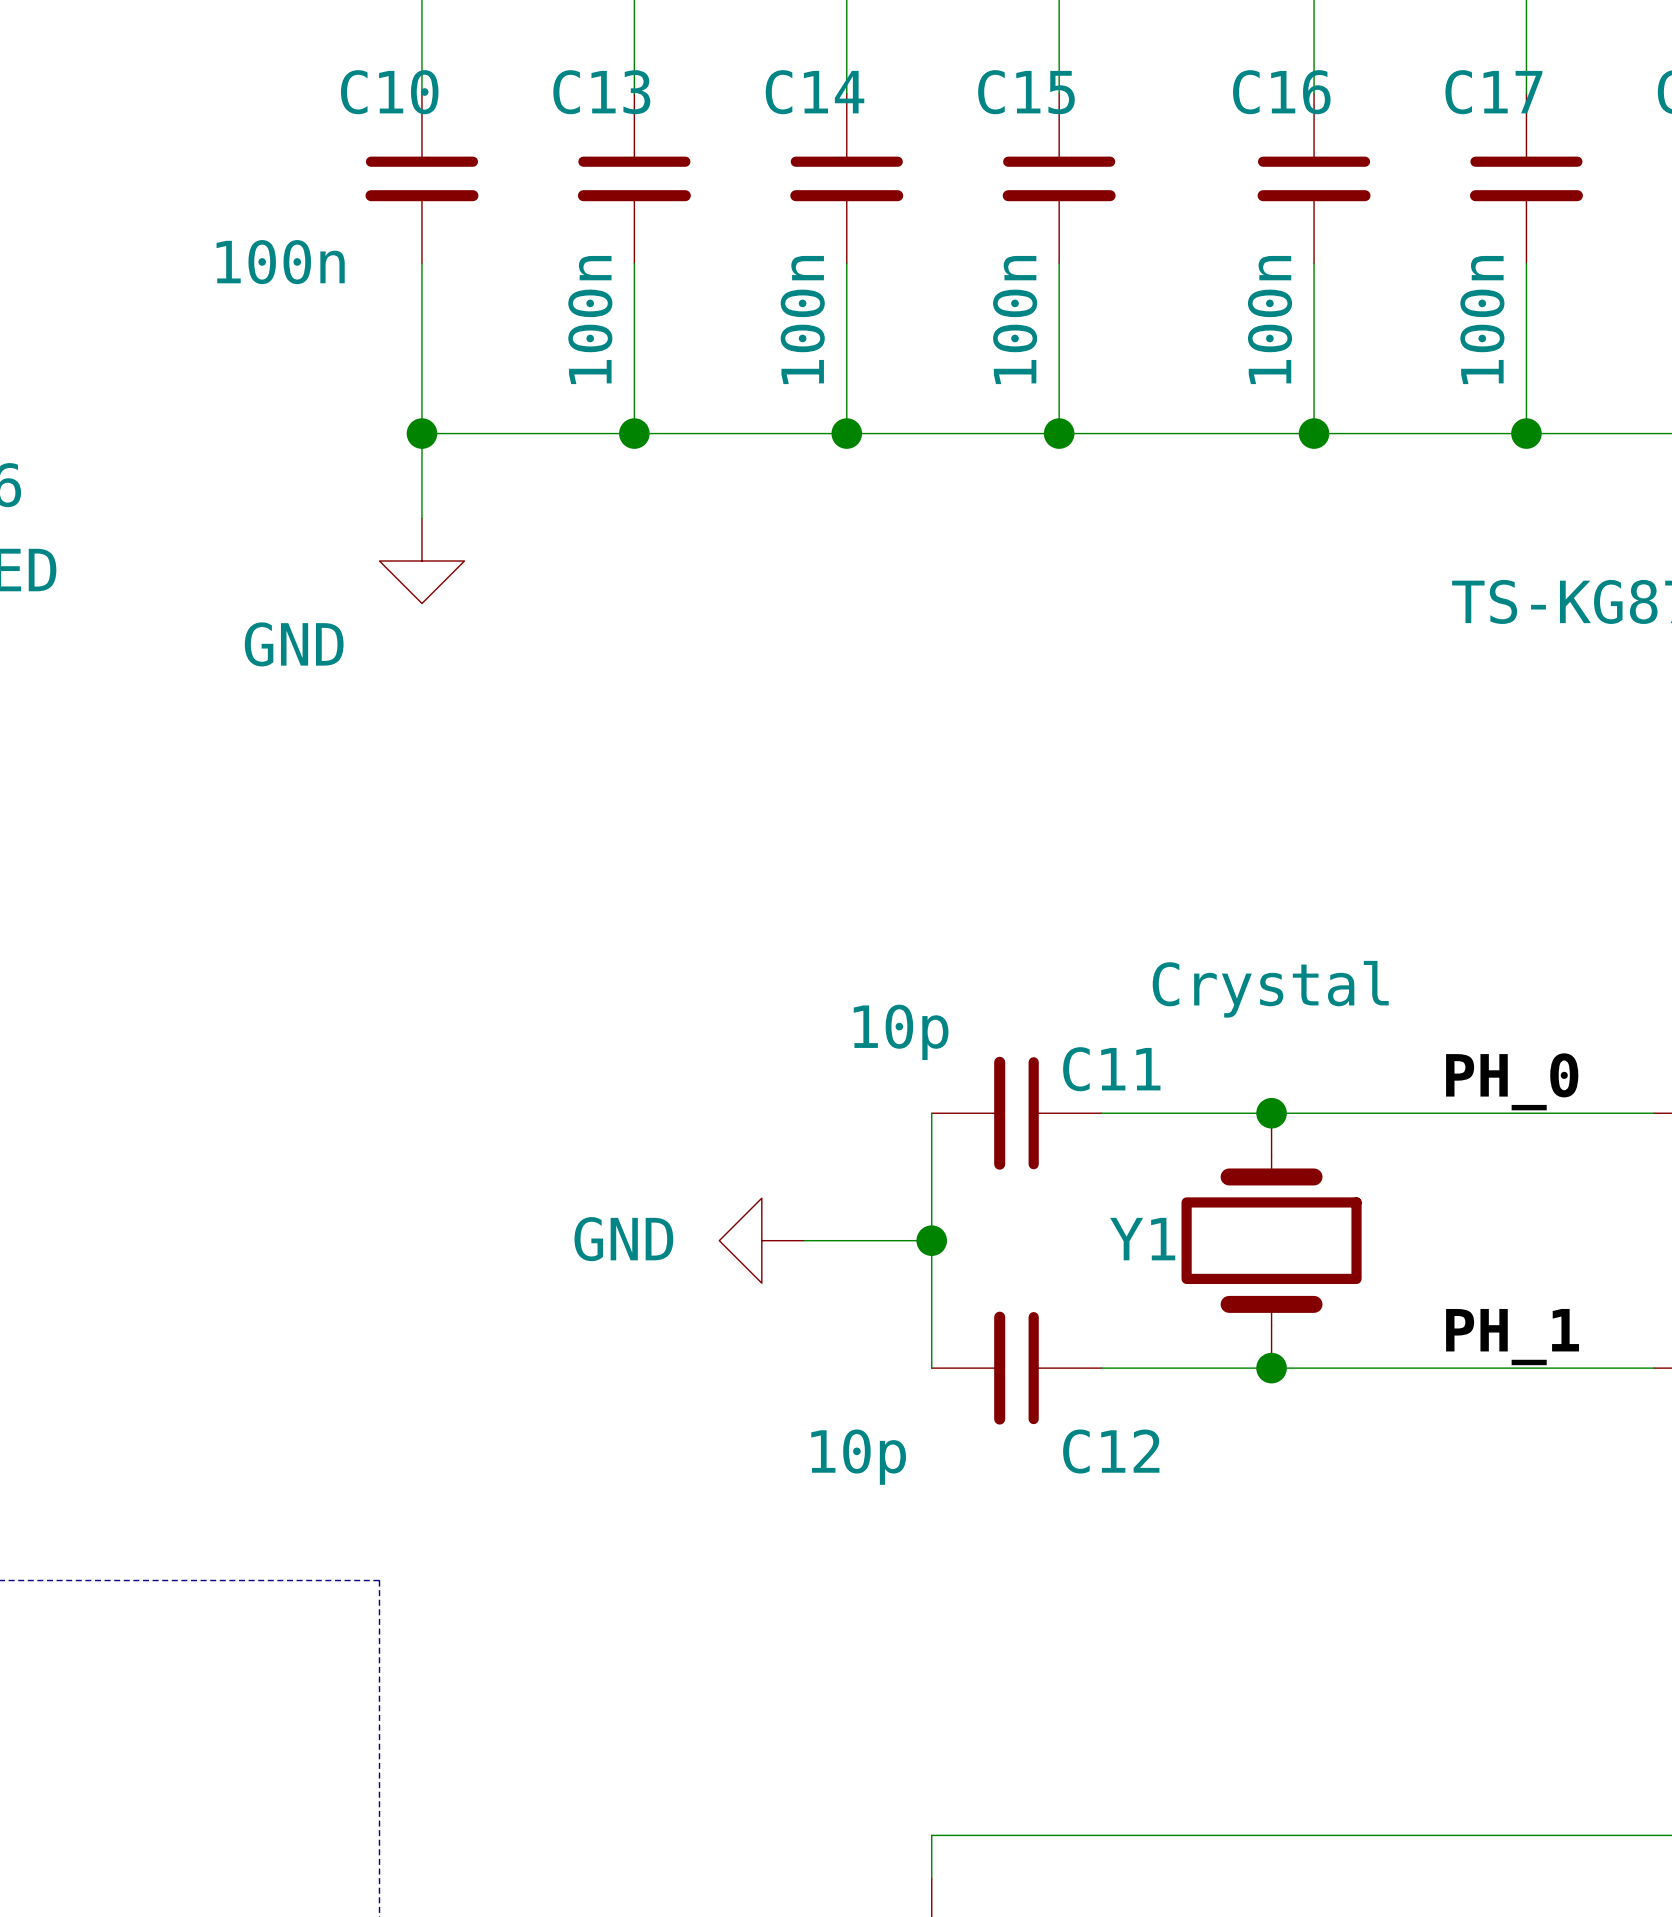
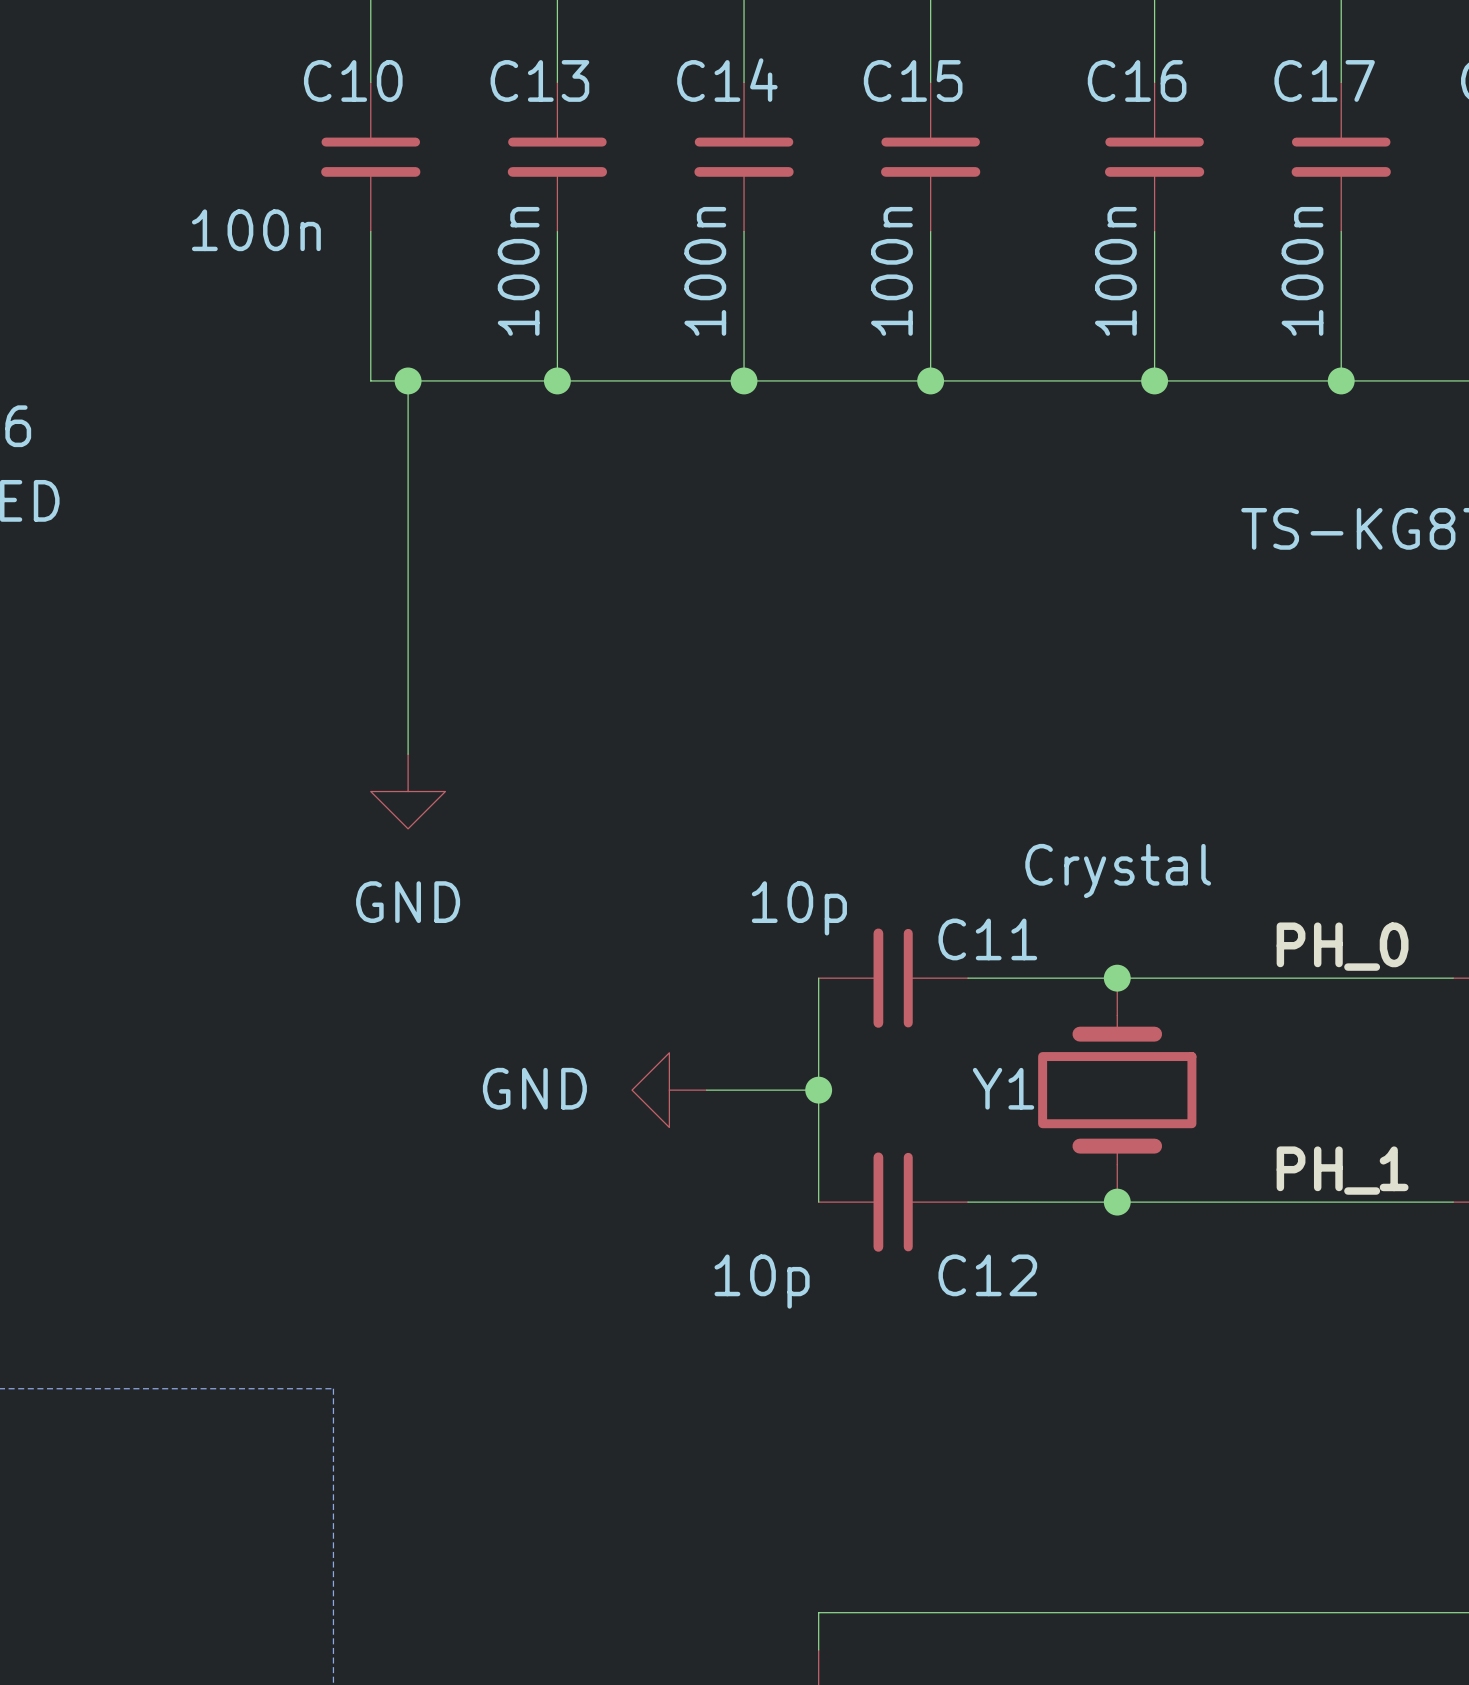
wire: (421, 433) (421, 518) -> none
junction position: (421, 433) -> (408, 380)
wire: none -> (408, 380) (408, 754)
power symbol position: GND (421, 561) -> GND (408, 791)
power symbol text position: GND (294, 644) -> GND (408, 902)

